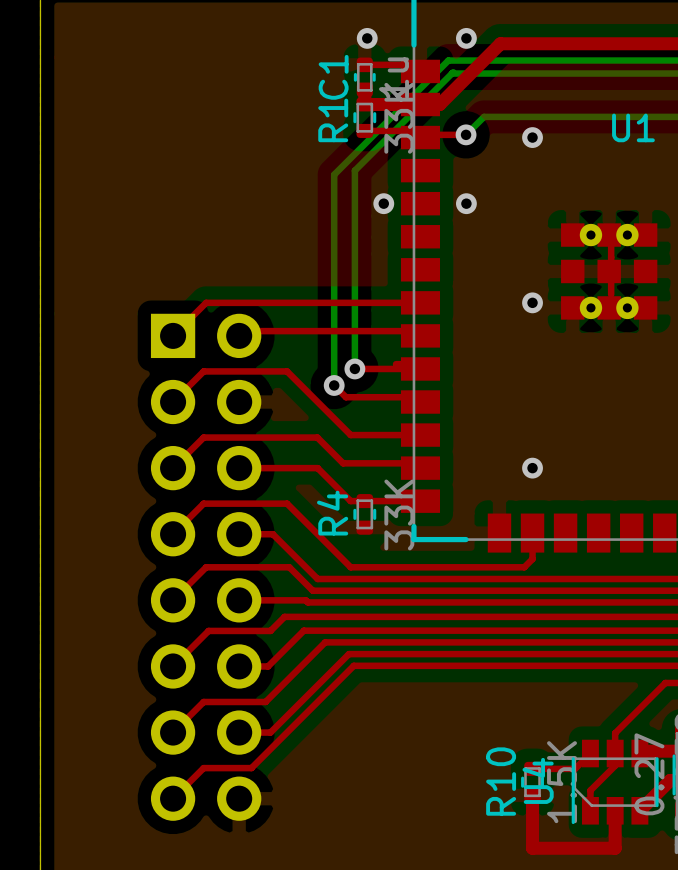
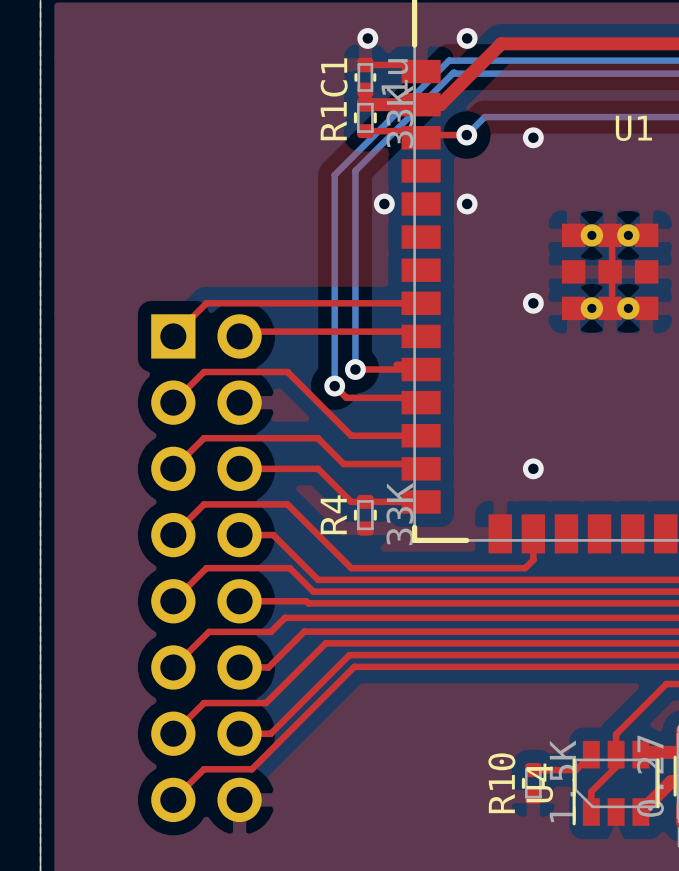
top track: (532, 795) (532, 848) (615, 848) (615, 810) -> none

